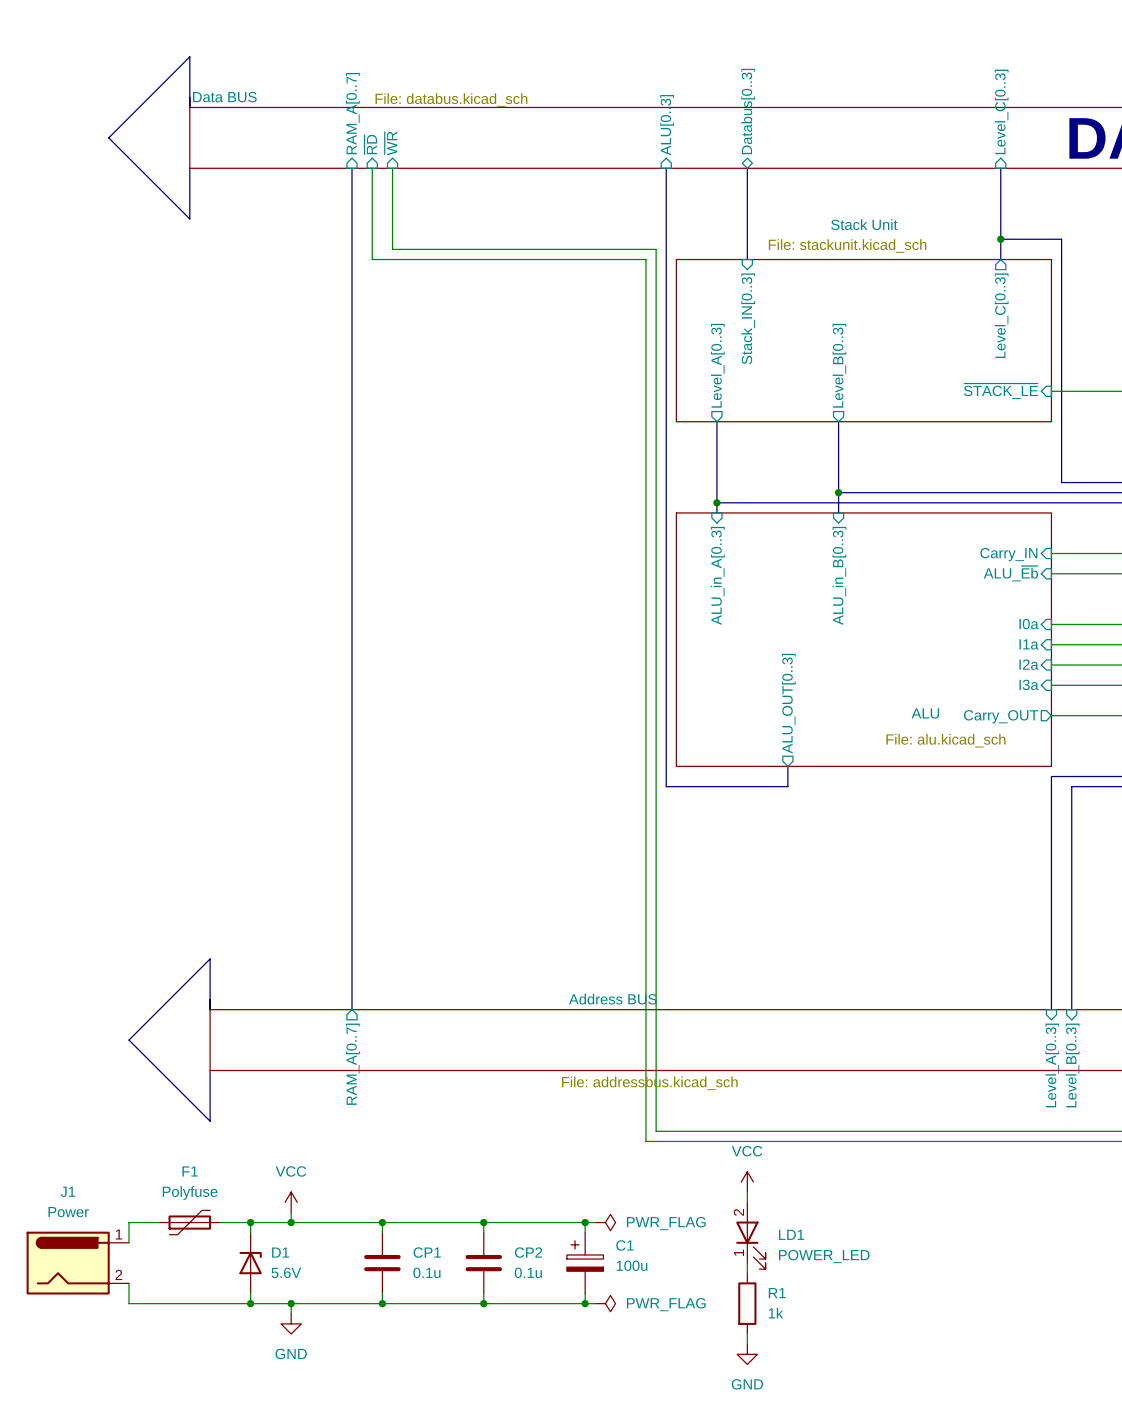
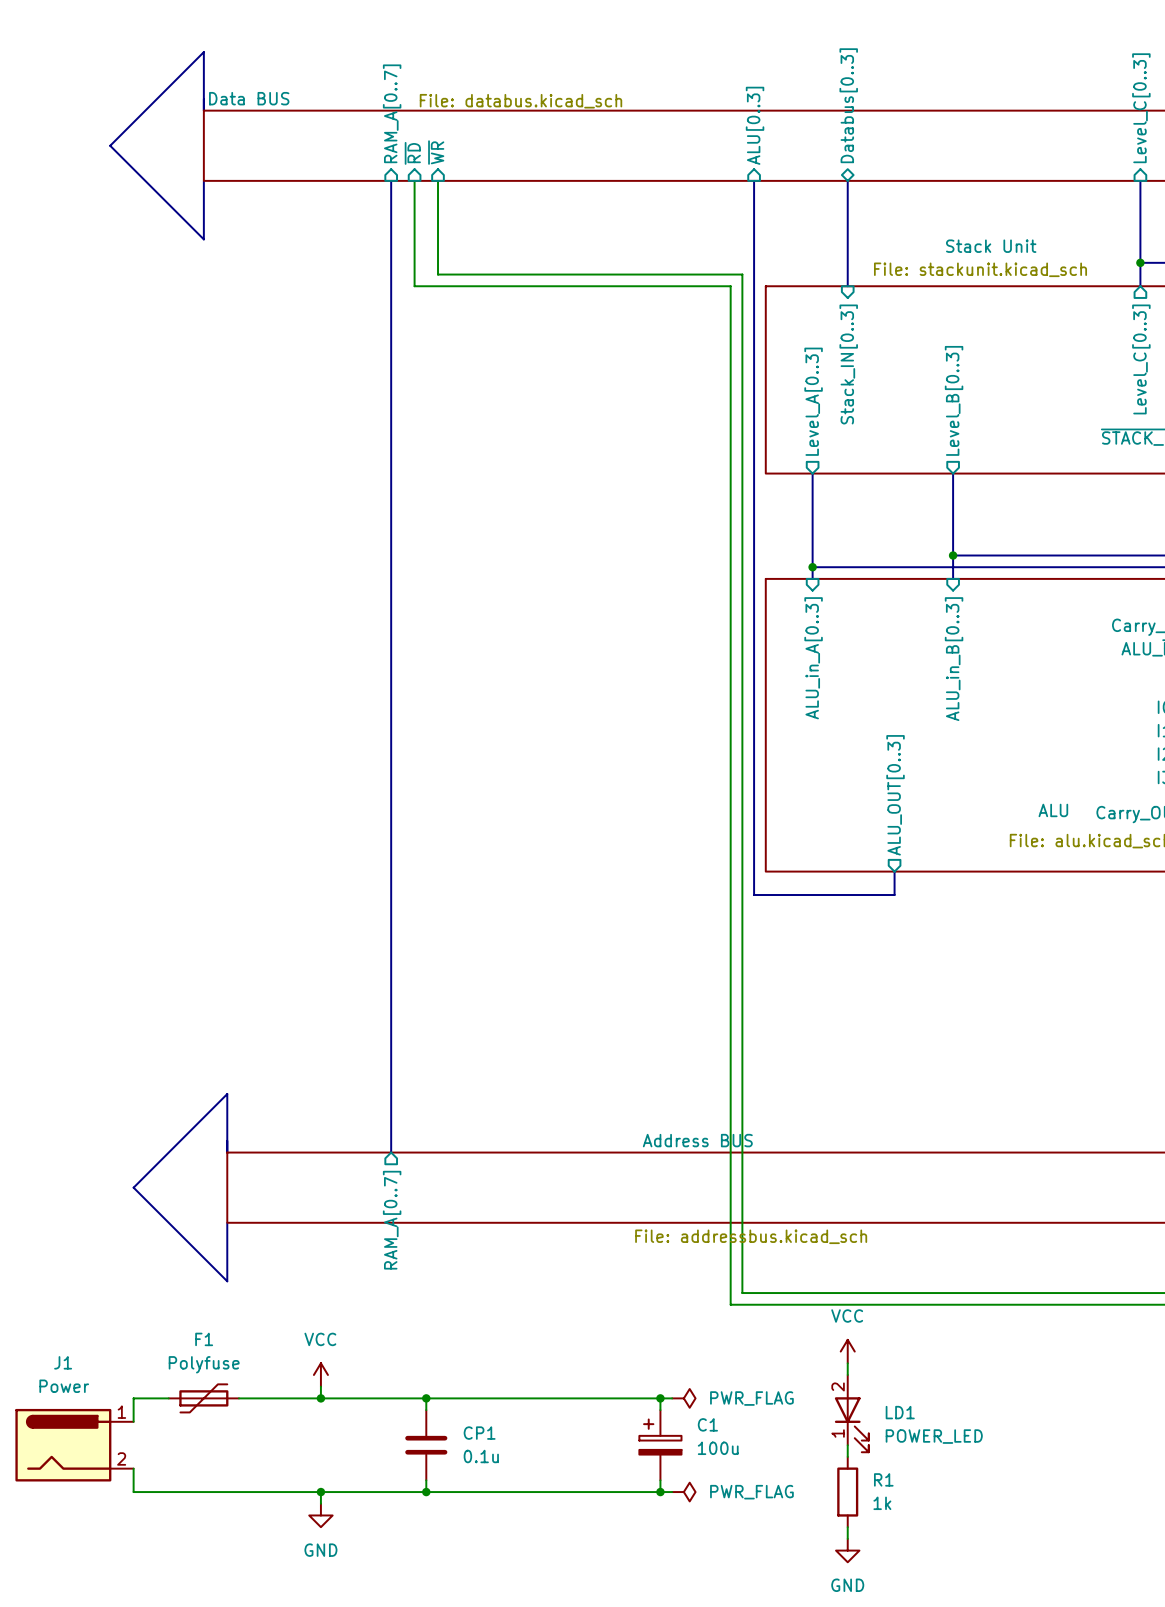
wire: (250, 1222) (250, 1232) -> none
junction: (250, 1222) -> none
wire: (483, 1222) (483, 1232) -> none
junction: (483, 1222) -> none
D1: 5.6V (250, 1263) -> none
CP2: 0.1u (483, 1263) -> none
wire: (250, 1293) (250, 1303) -> none
wire: (483, 1293) (483, 1303) -> none
junction: (250, 1303) -> none
junction: (483, 1303) -> none

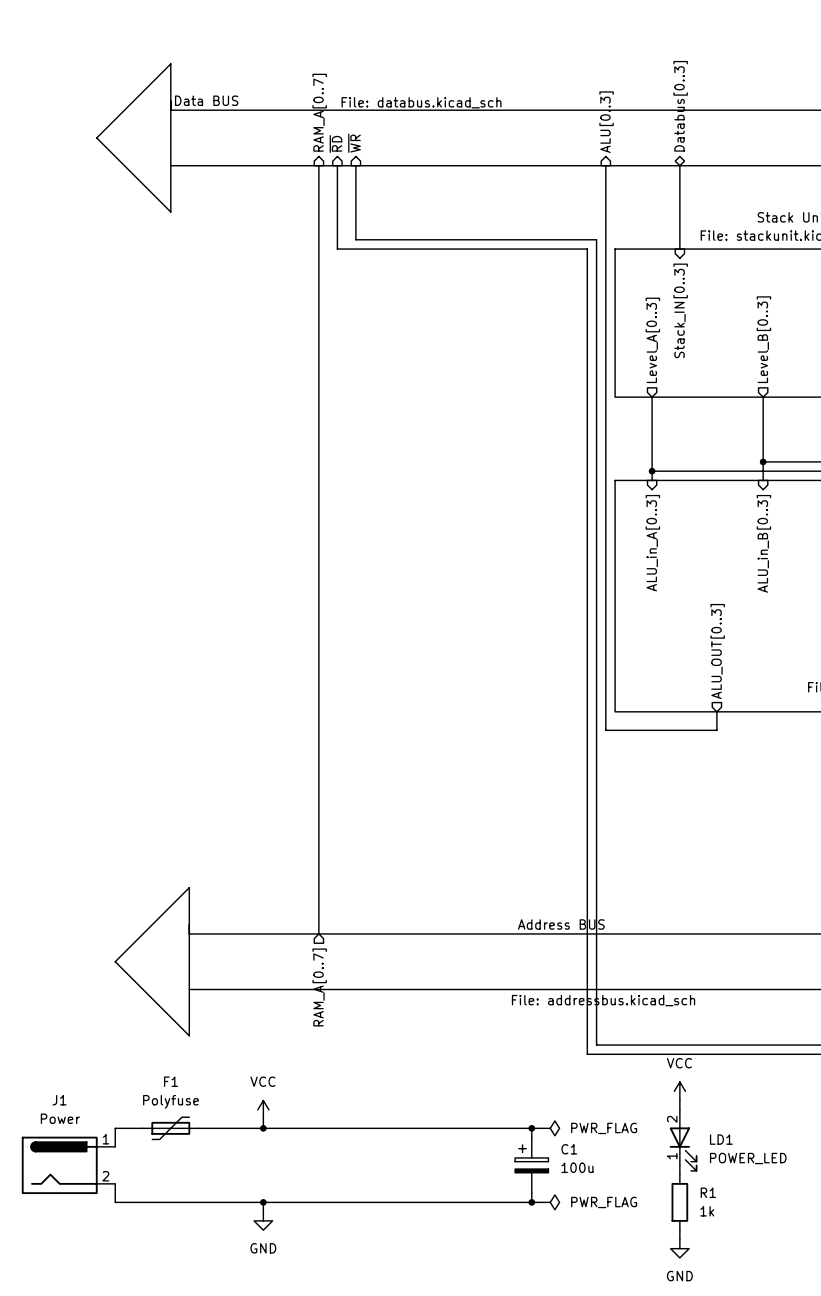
wire: (426, 1398) (426, 1410) -> none
junction: (426, 1398) -> none
CP1: 0.1u (426, 1445) -> none
wire: (426, 1480) (426, 1492) -> none
junction: (426, 1492) -> none

